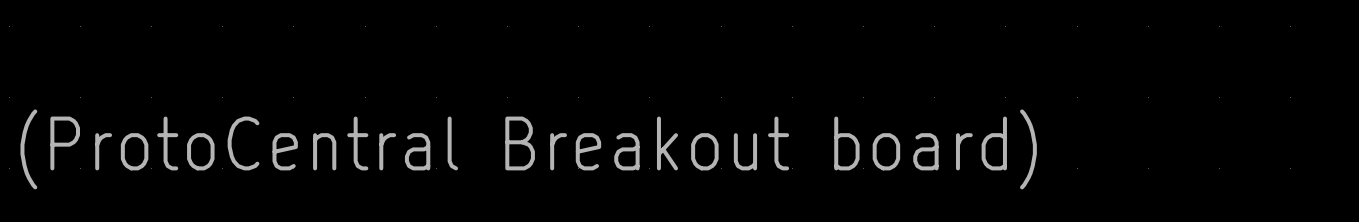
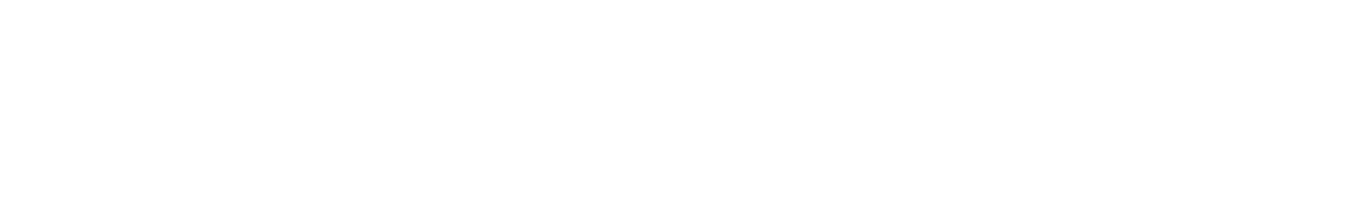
text: (ProtoCentral Breakout board) (528, 149) -> none

